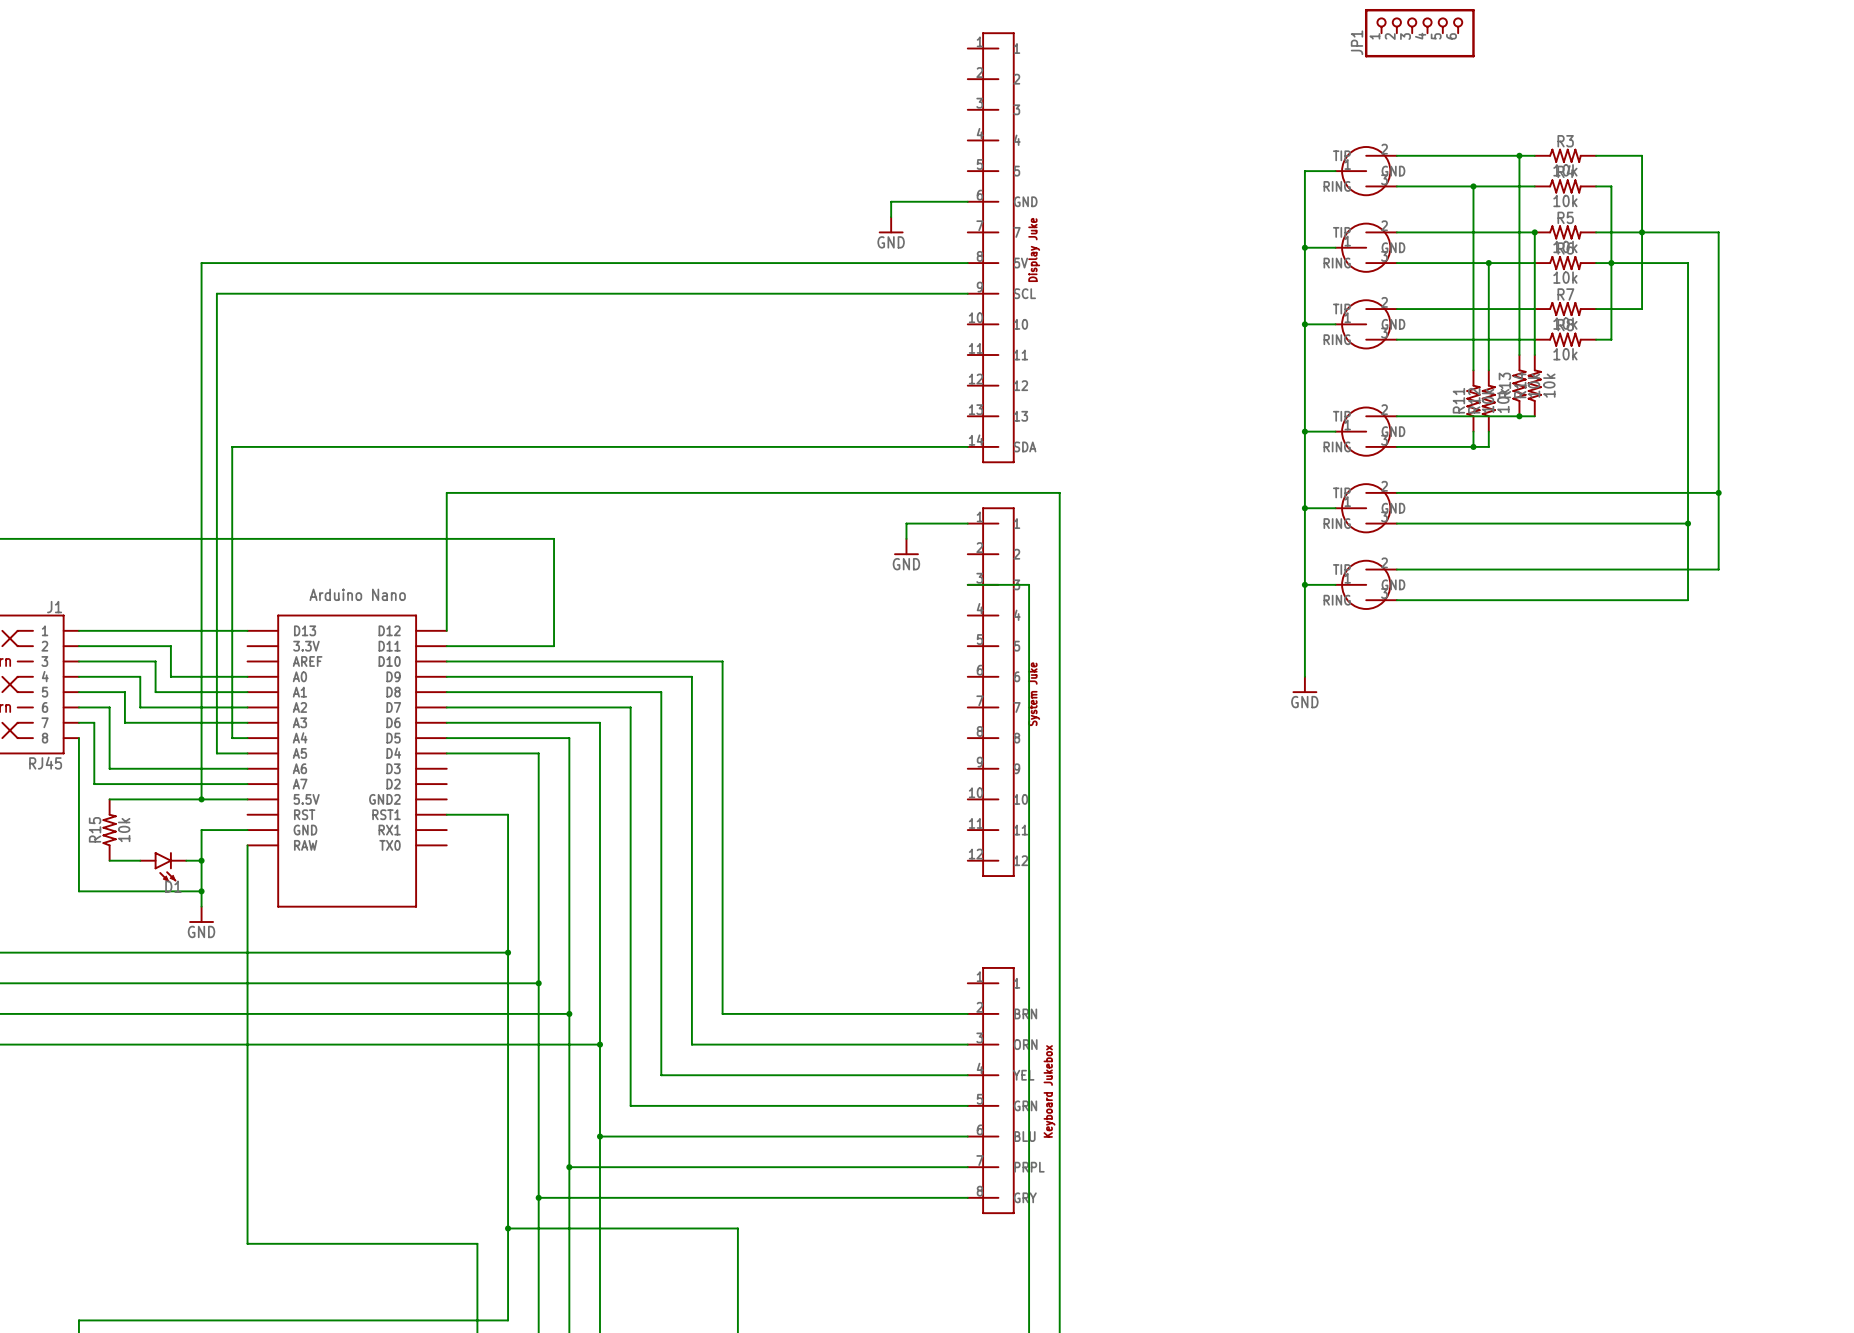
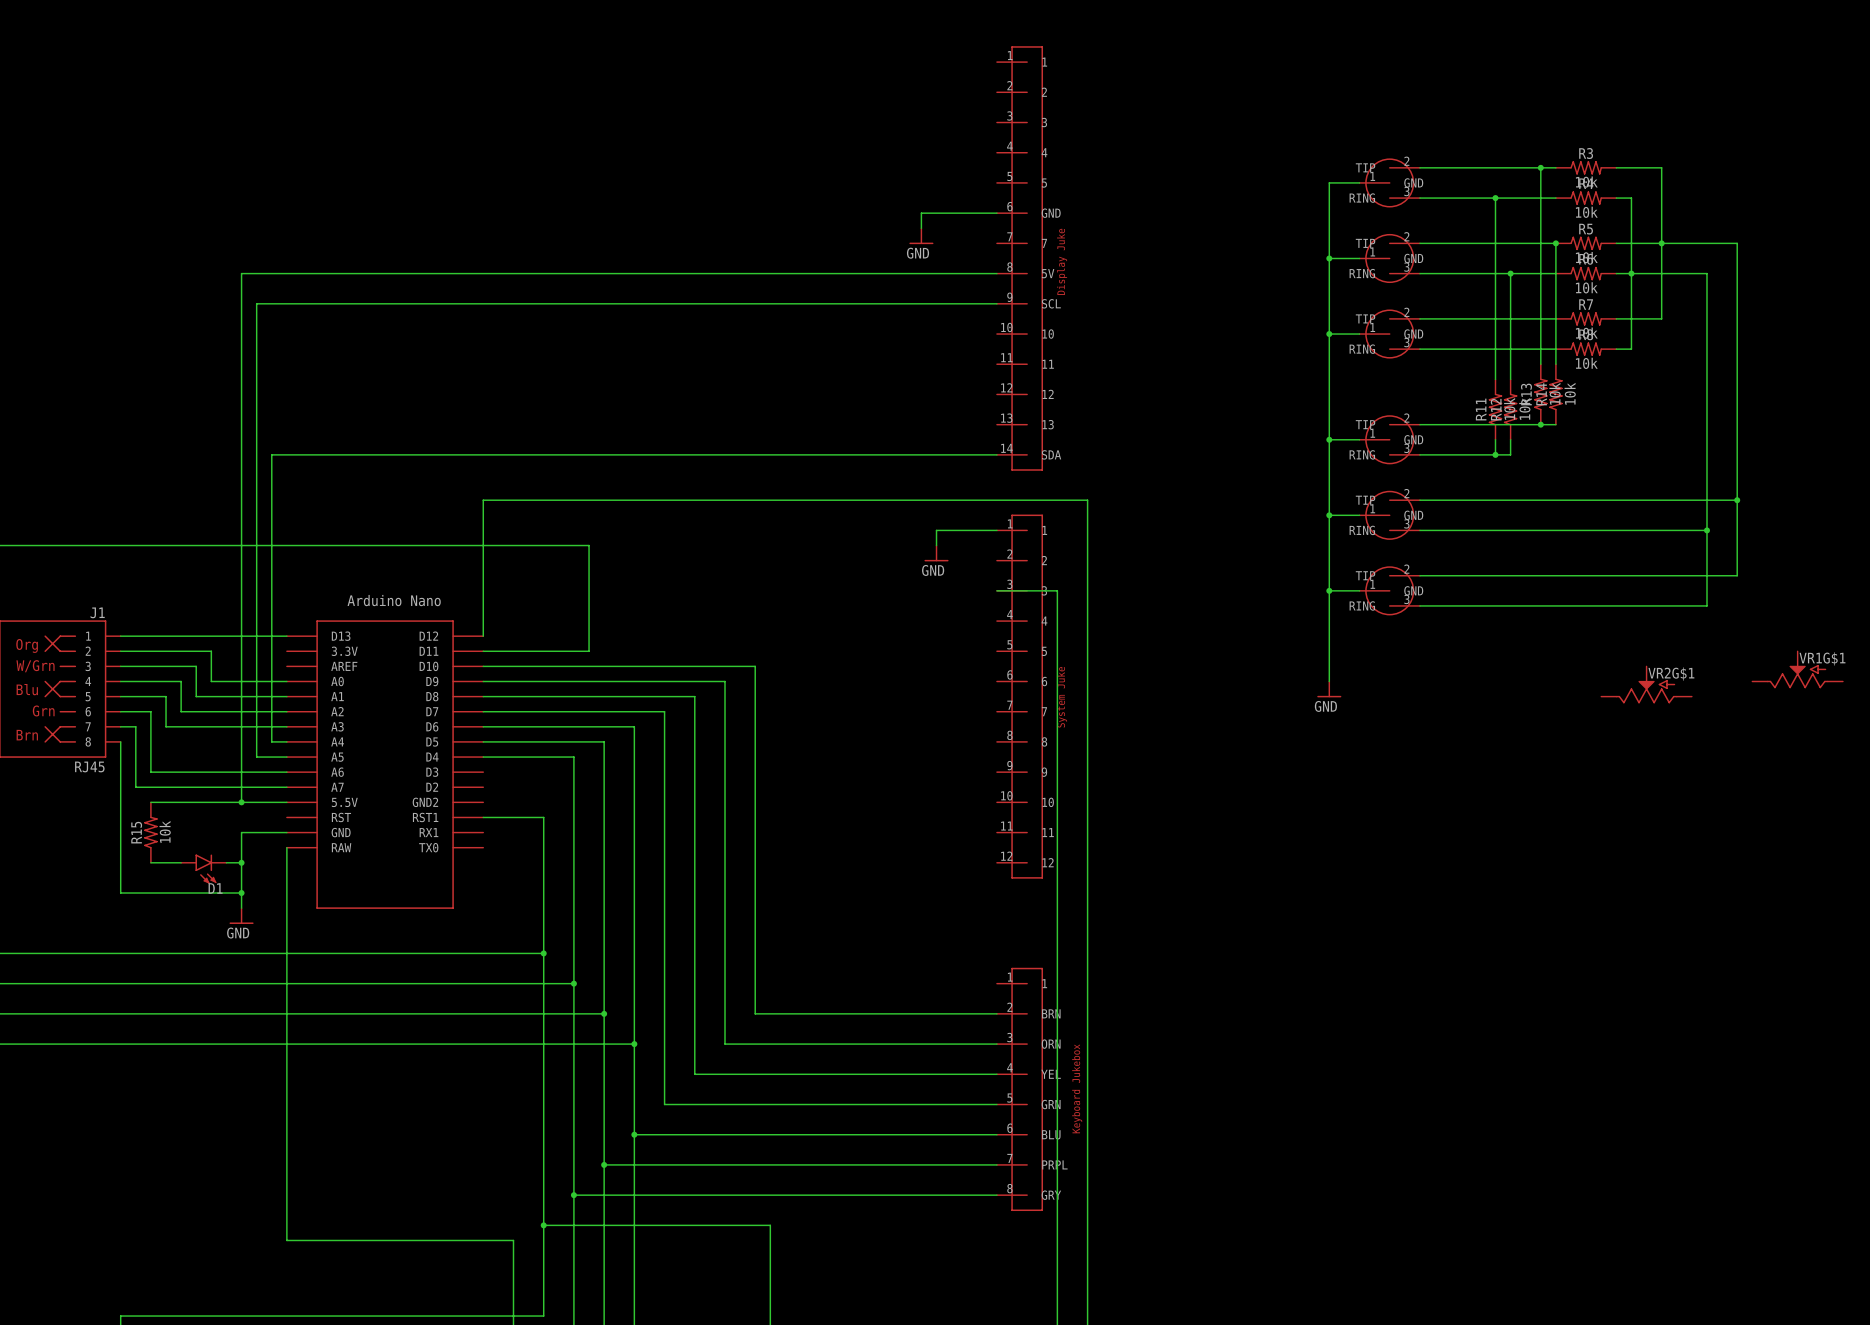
JP1: (1419, 33) -> none
VR1G$1: none -> (1797, 669)
VR2G$1: none -> (1646, 684)

